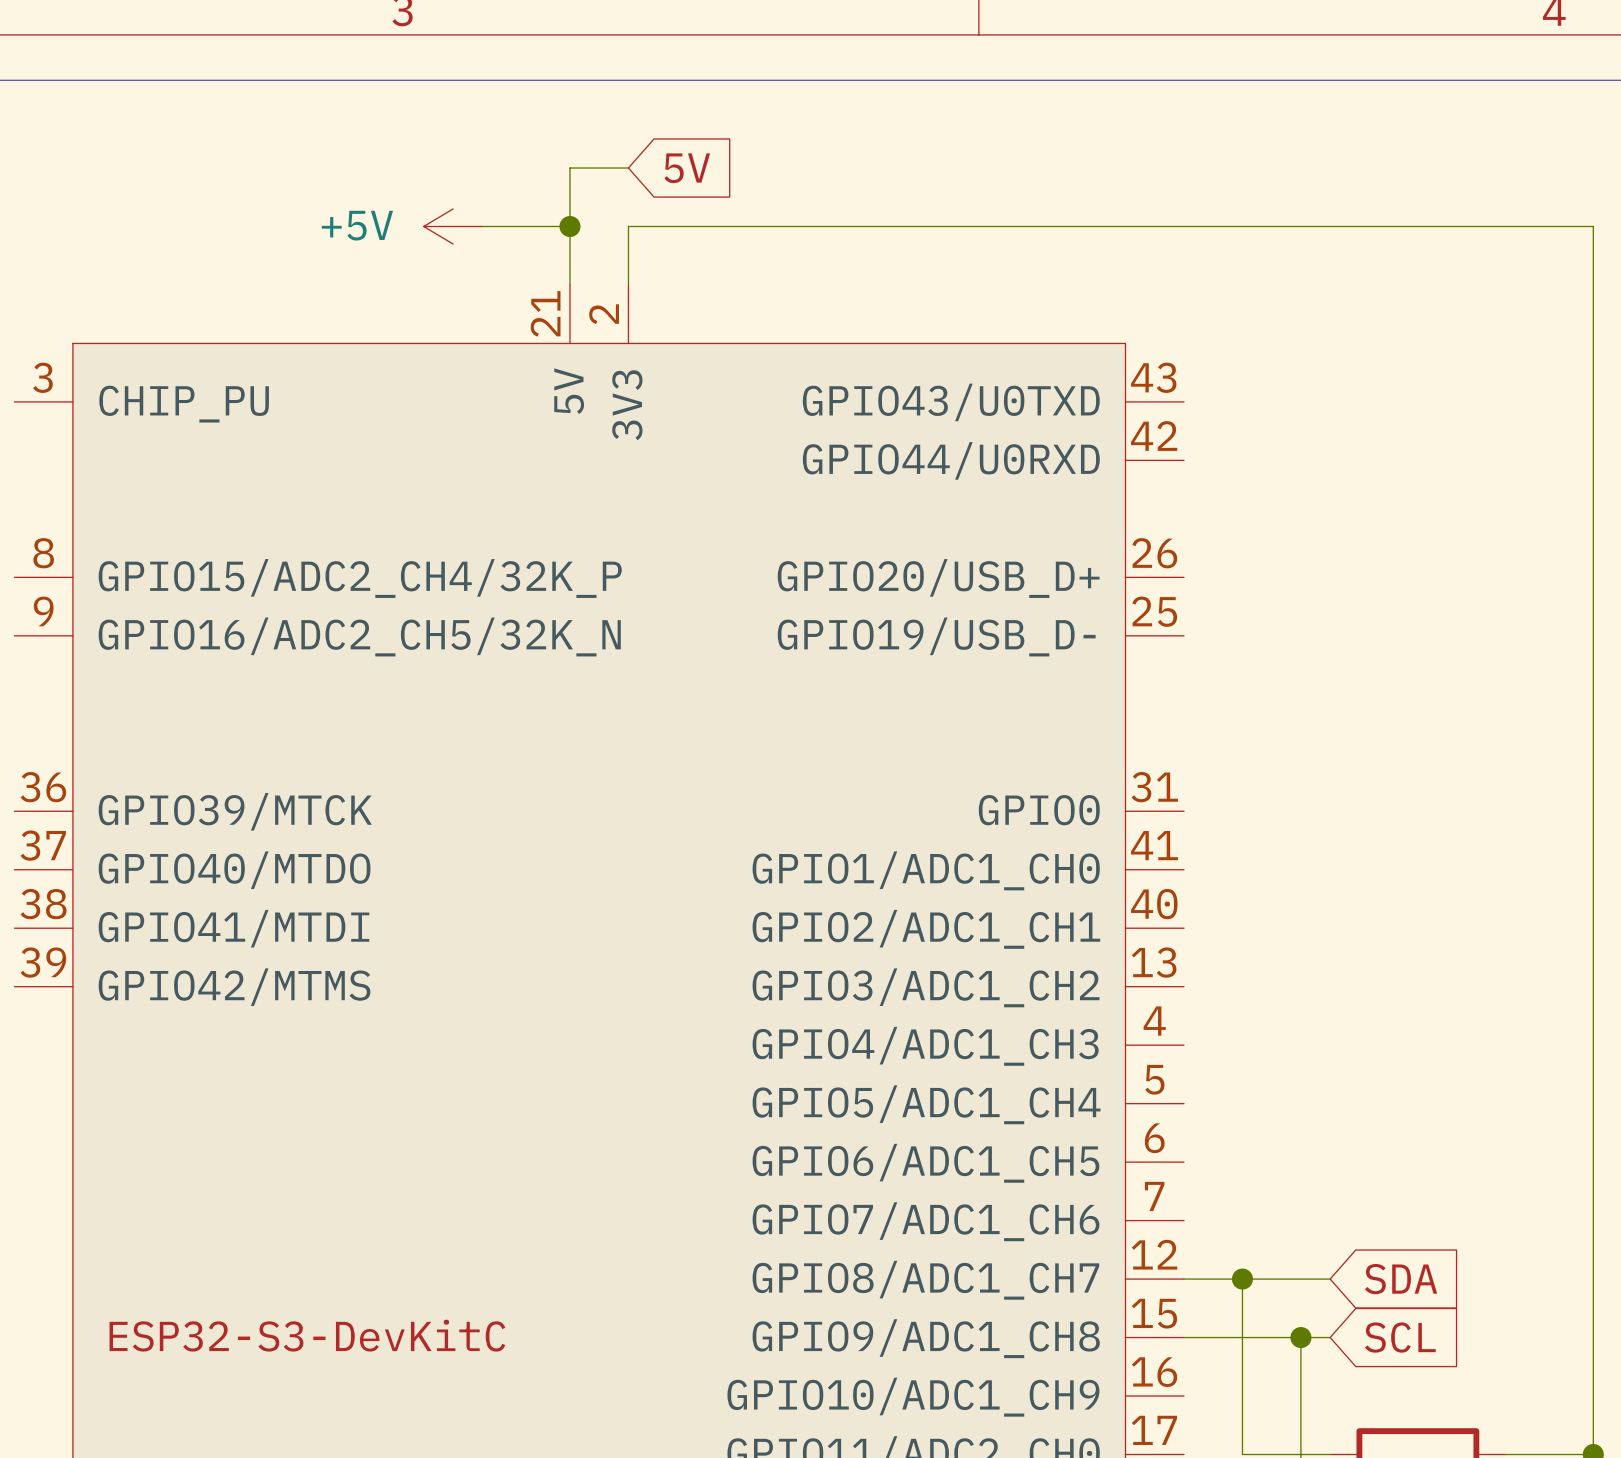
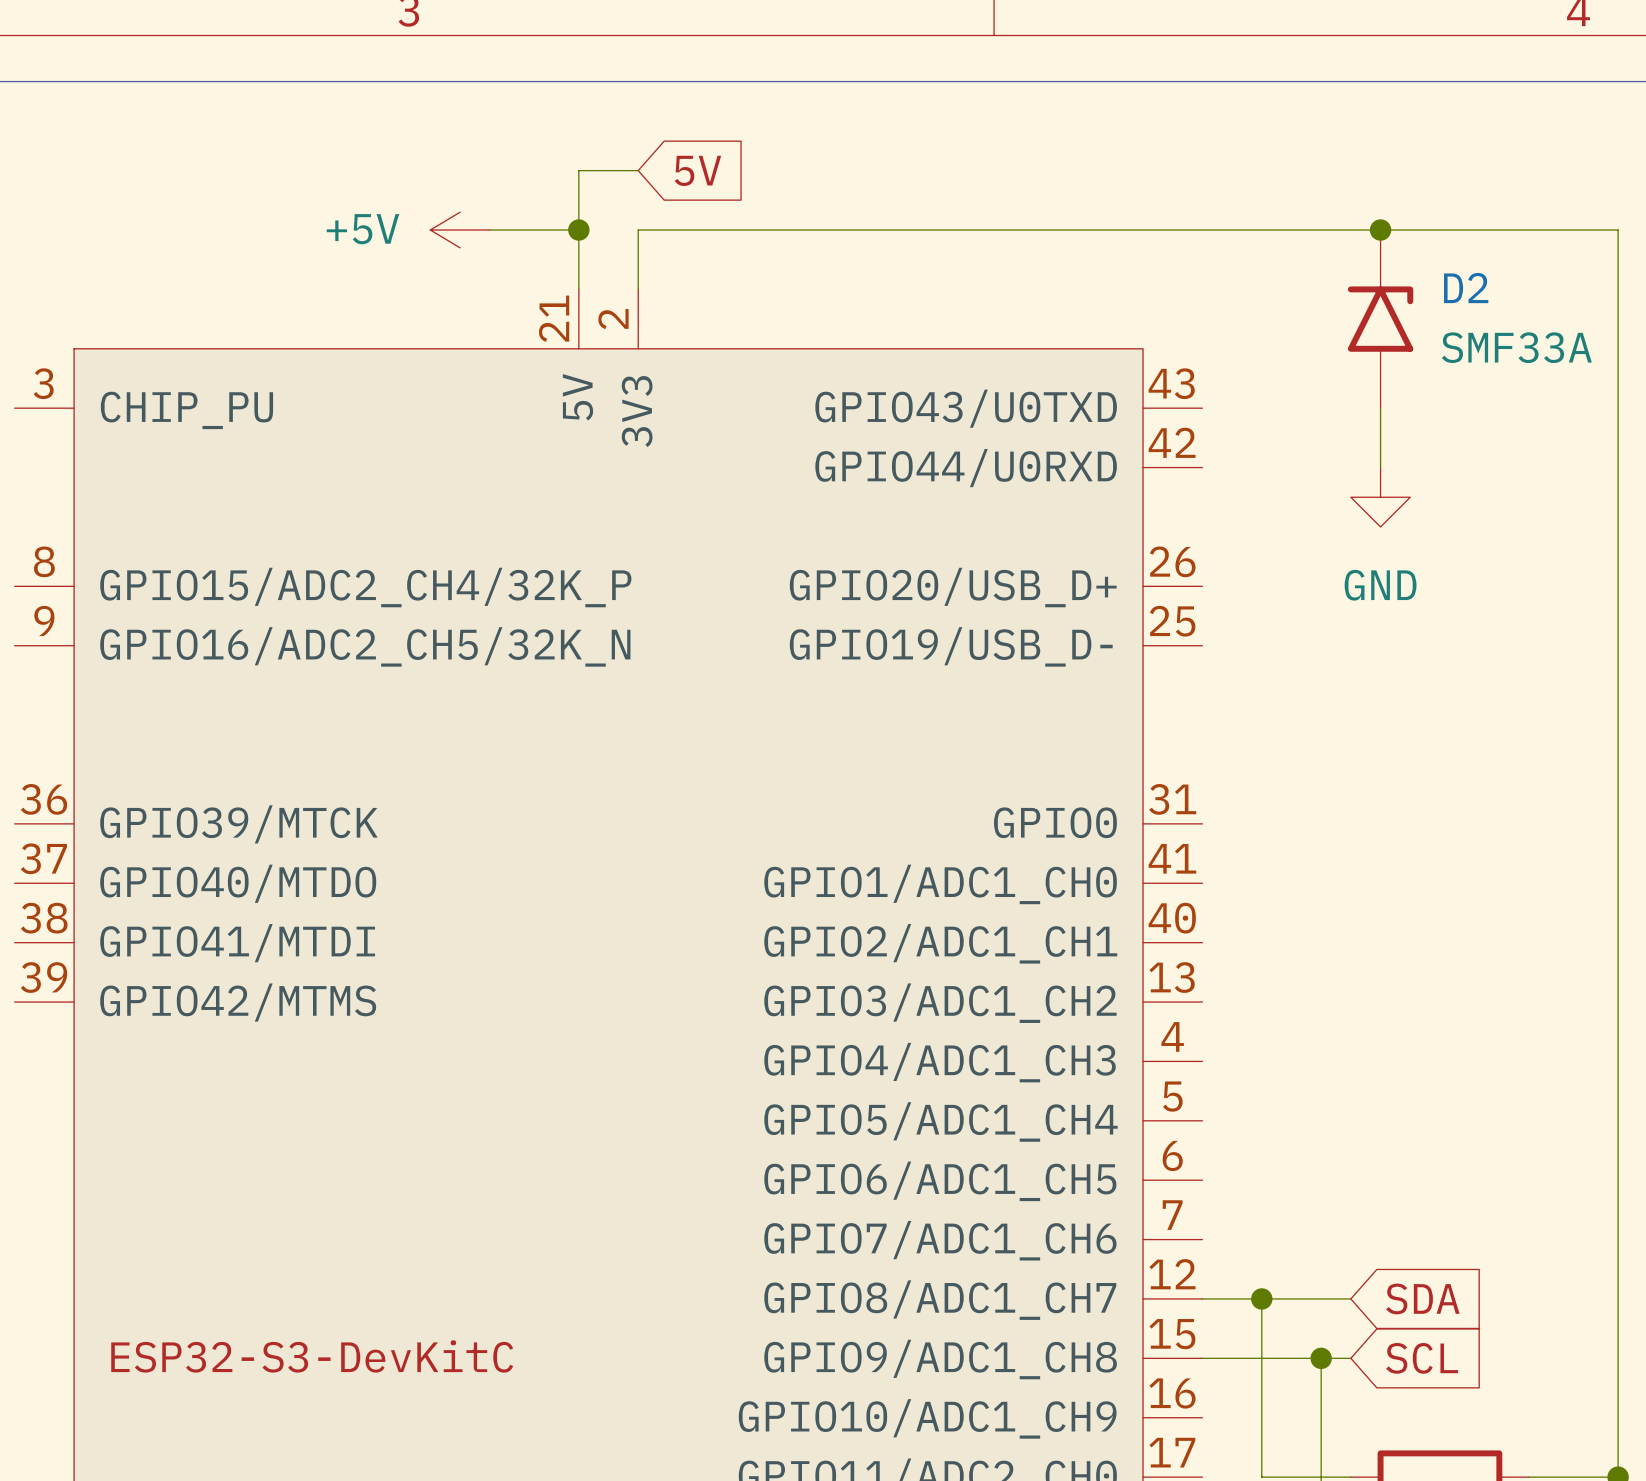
junction: none -> (1380, 230)
D2: none -> SMF33A (1380, 319)
wire: none -> (1380, 408) (1380, 467)
power symbol: none -> GND (1380, 497)

